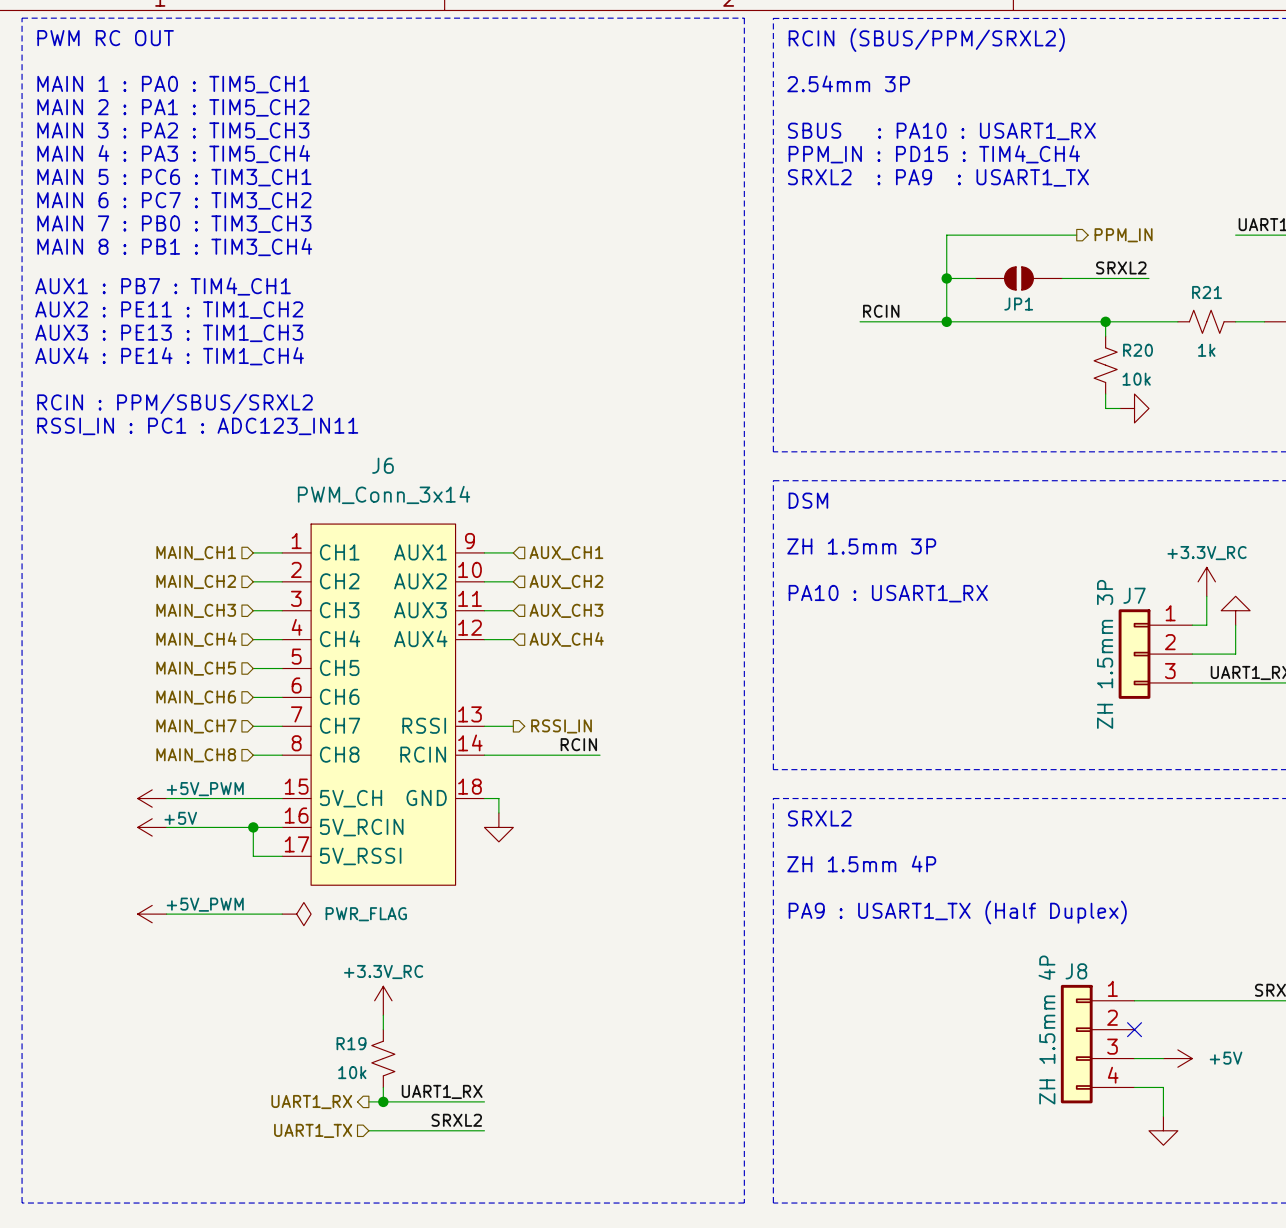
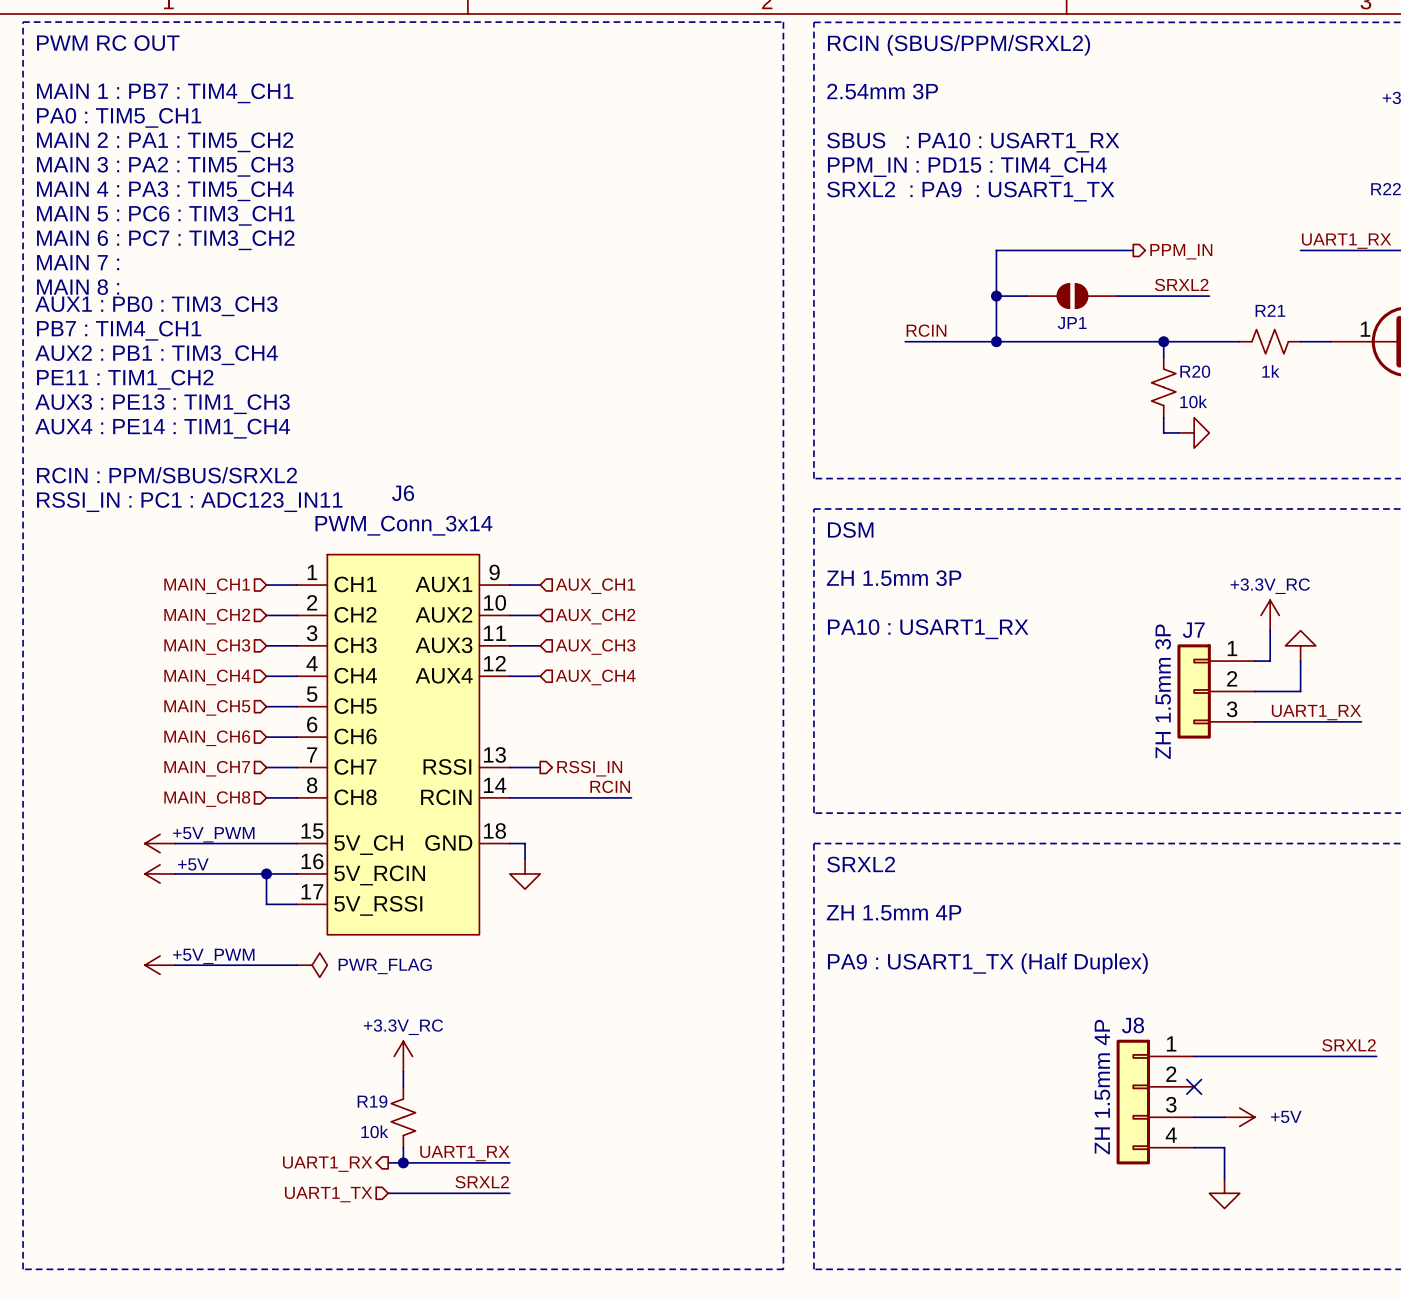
text: MAIN 1 : PA0 : TIM5_CH1 (173, 84) -> MAIN 1 : PB7 : TIM4_CH1 (165, 93)
text: MAIN 2 : PA1 : TIM5_CH2 (173, 107) -> PA0 : TIM5_CH1 (119, 117)
text: MAIN 3 : PA2 : TIM5_CH3 (173, 131) -> MAIN 2 : PA1 : TIM5_CH2 (165, 142)
text: MAIN 4 : PA3 : TIM5_CH4 (173, 154) -> MAIN 3 : PA2 : TIM5_CH3 (165, 166)
text: MAIN 5 : PC6 : TIM3_CH1 (174, 177) -> MAIN 4 : PA3 : TIM5_CH4 (165, 191)
text: MAIN 6 : PC7 : TIM3_CH2 (174, 200) -> MAIN 5 : PC6 : TIM3_CH1 (165, 215)
text: MAIN 7 : PB0 : TIM3_CH3 (174, 224) -> MAIN 6 : PC7 : TIM3_CH2 (165, 240)
text: MAIN 8 : PB1 : TIM3_CH4 (174, 247) -> MAIN 7 : (78, 262)
text: none -> MAIN 8 : (78, 287)
text: AUX1 : PB7 : TIM4_CH1 (163, 286) -> AUX1 : PB0 : TIM3_CH3 (156, 306)
text: AUX2 : PE11 : TIM1_CH2 (169, 310) -> PB7 : TIM4_CH1 (119, 330)
text: AUX3 : PE13 : TIM1_CH3 (169, 333) -> AUX2 : PB1 : TIM3_CH4 (156, 355)
text: AUX4 : PE14 : TIM1_CH4 (169, 356) -> PE11 : TIM1_CH2 (125, 379)
text: none -> AUX3 : PE13 : TIM1_CH3 (162, 404)
text: RCIN : PPM/SBUS/SRXL2 (175, 403) -> AUX4 : PE14 : TIM1_CH4 (162, 428)
text position: RSSI_IN : PC1 : ADC123_IN11 (197, 426) -> RSSI_IN : PC1 : ADC123_IN11 (189, 502)
text: none -> RCIN : PPM/SBUS/SRXL2 (167, 475)

